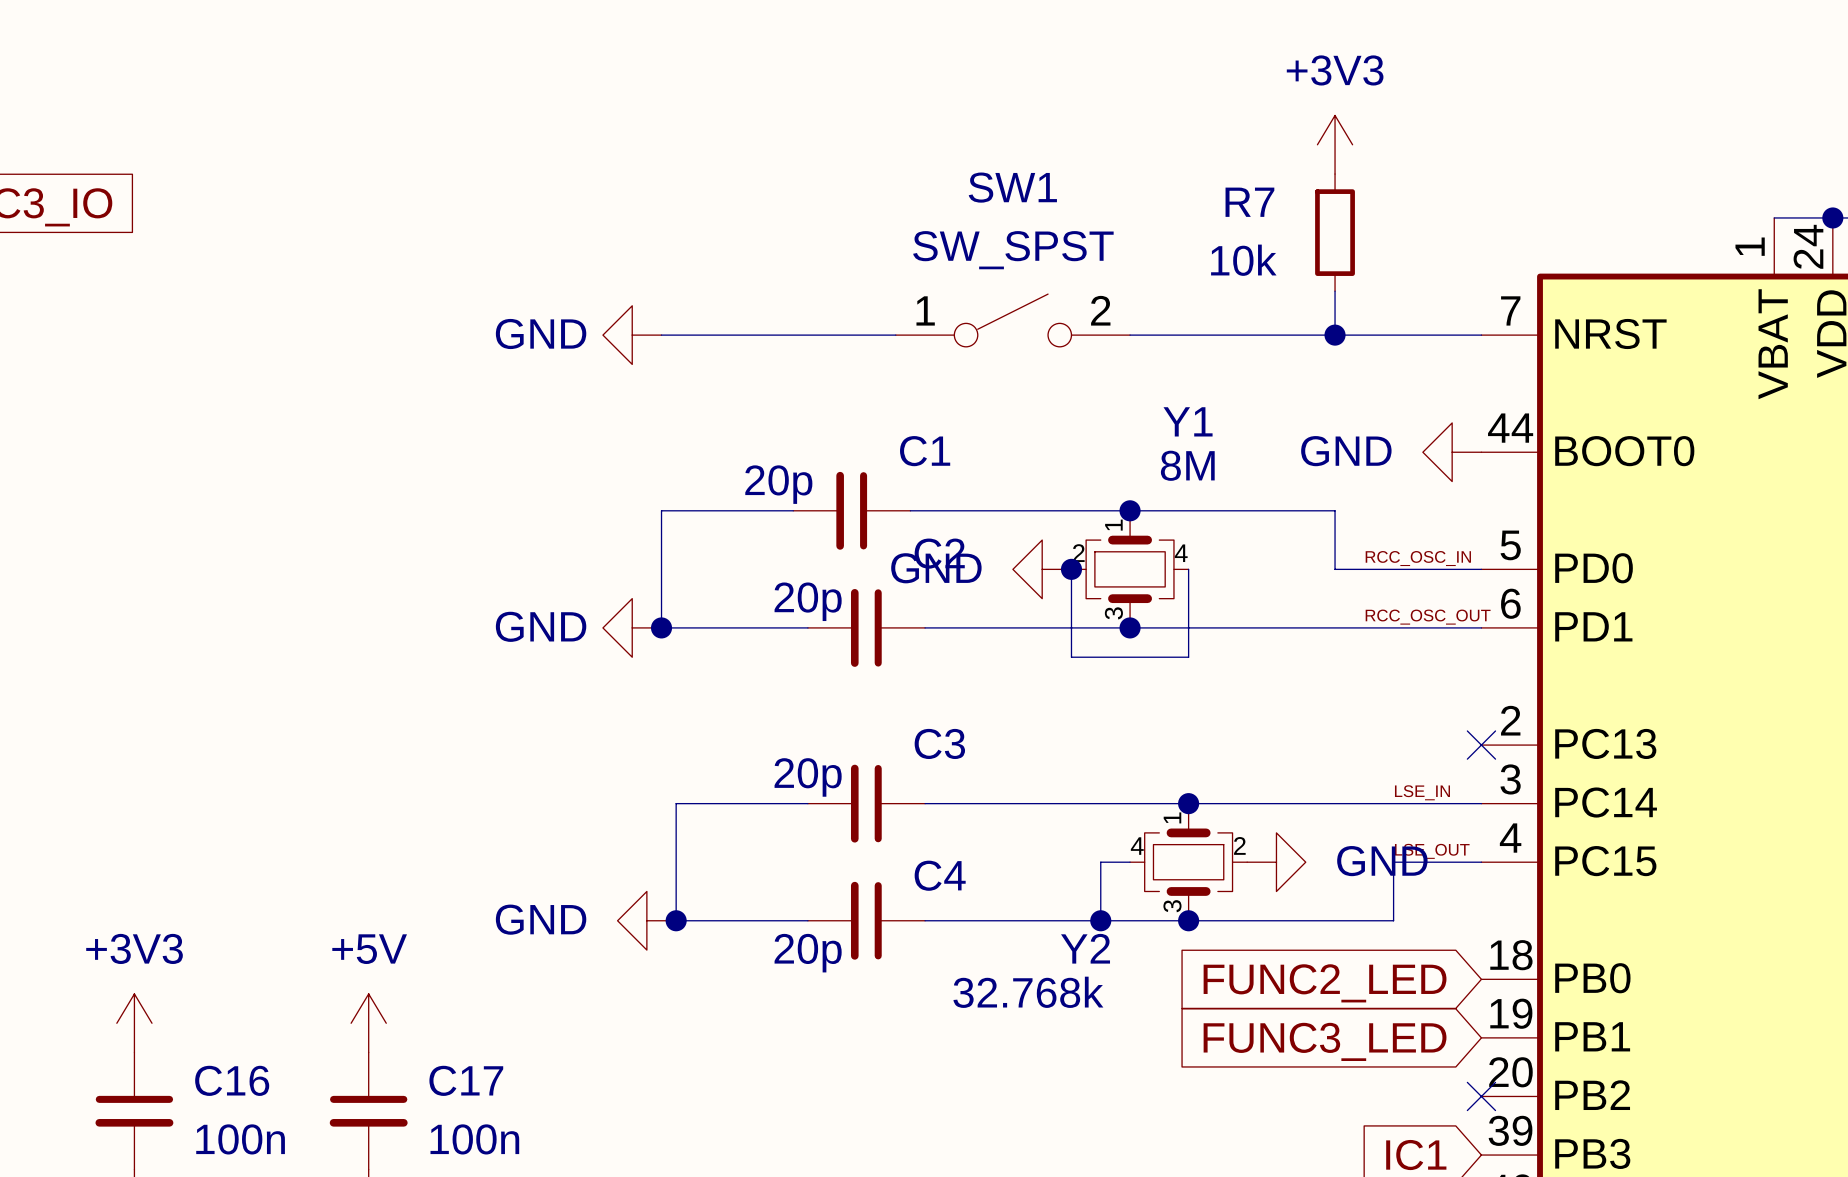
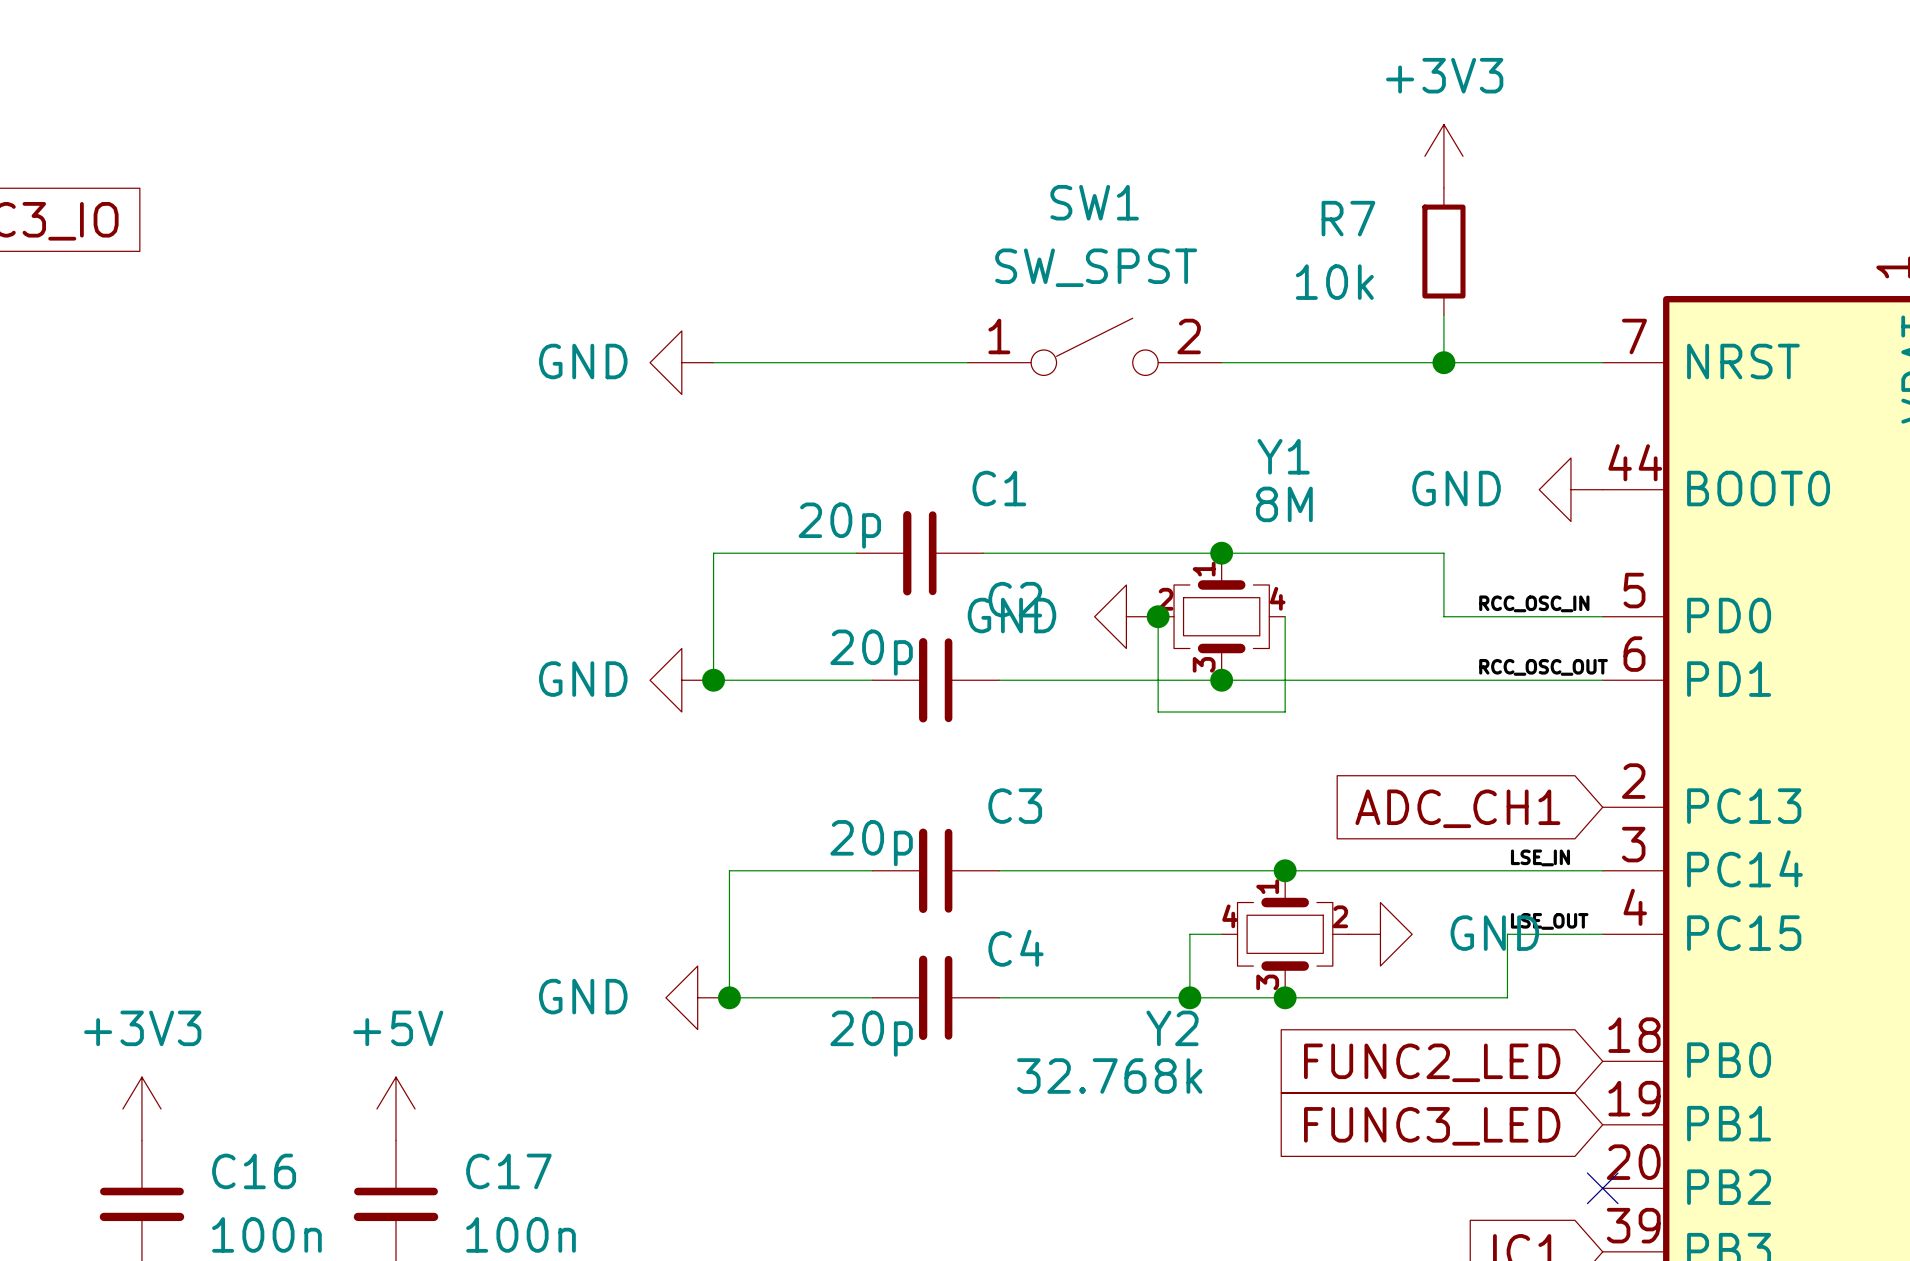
no-connect mark: (1481, 745) -> none
global label: none -> ADC_CH1 (1457, 808)

